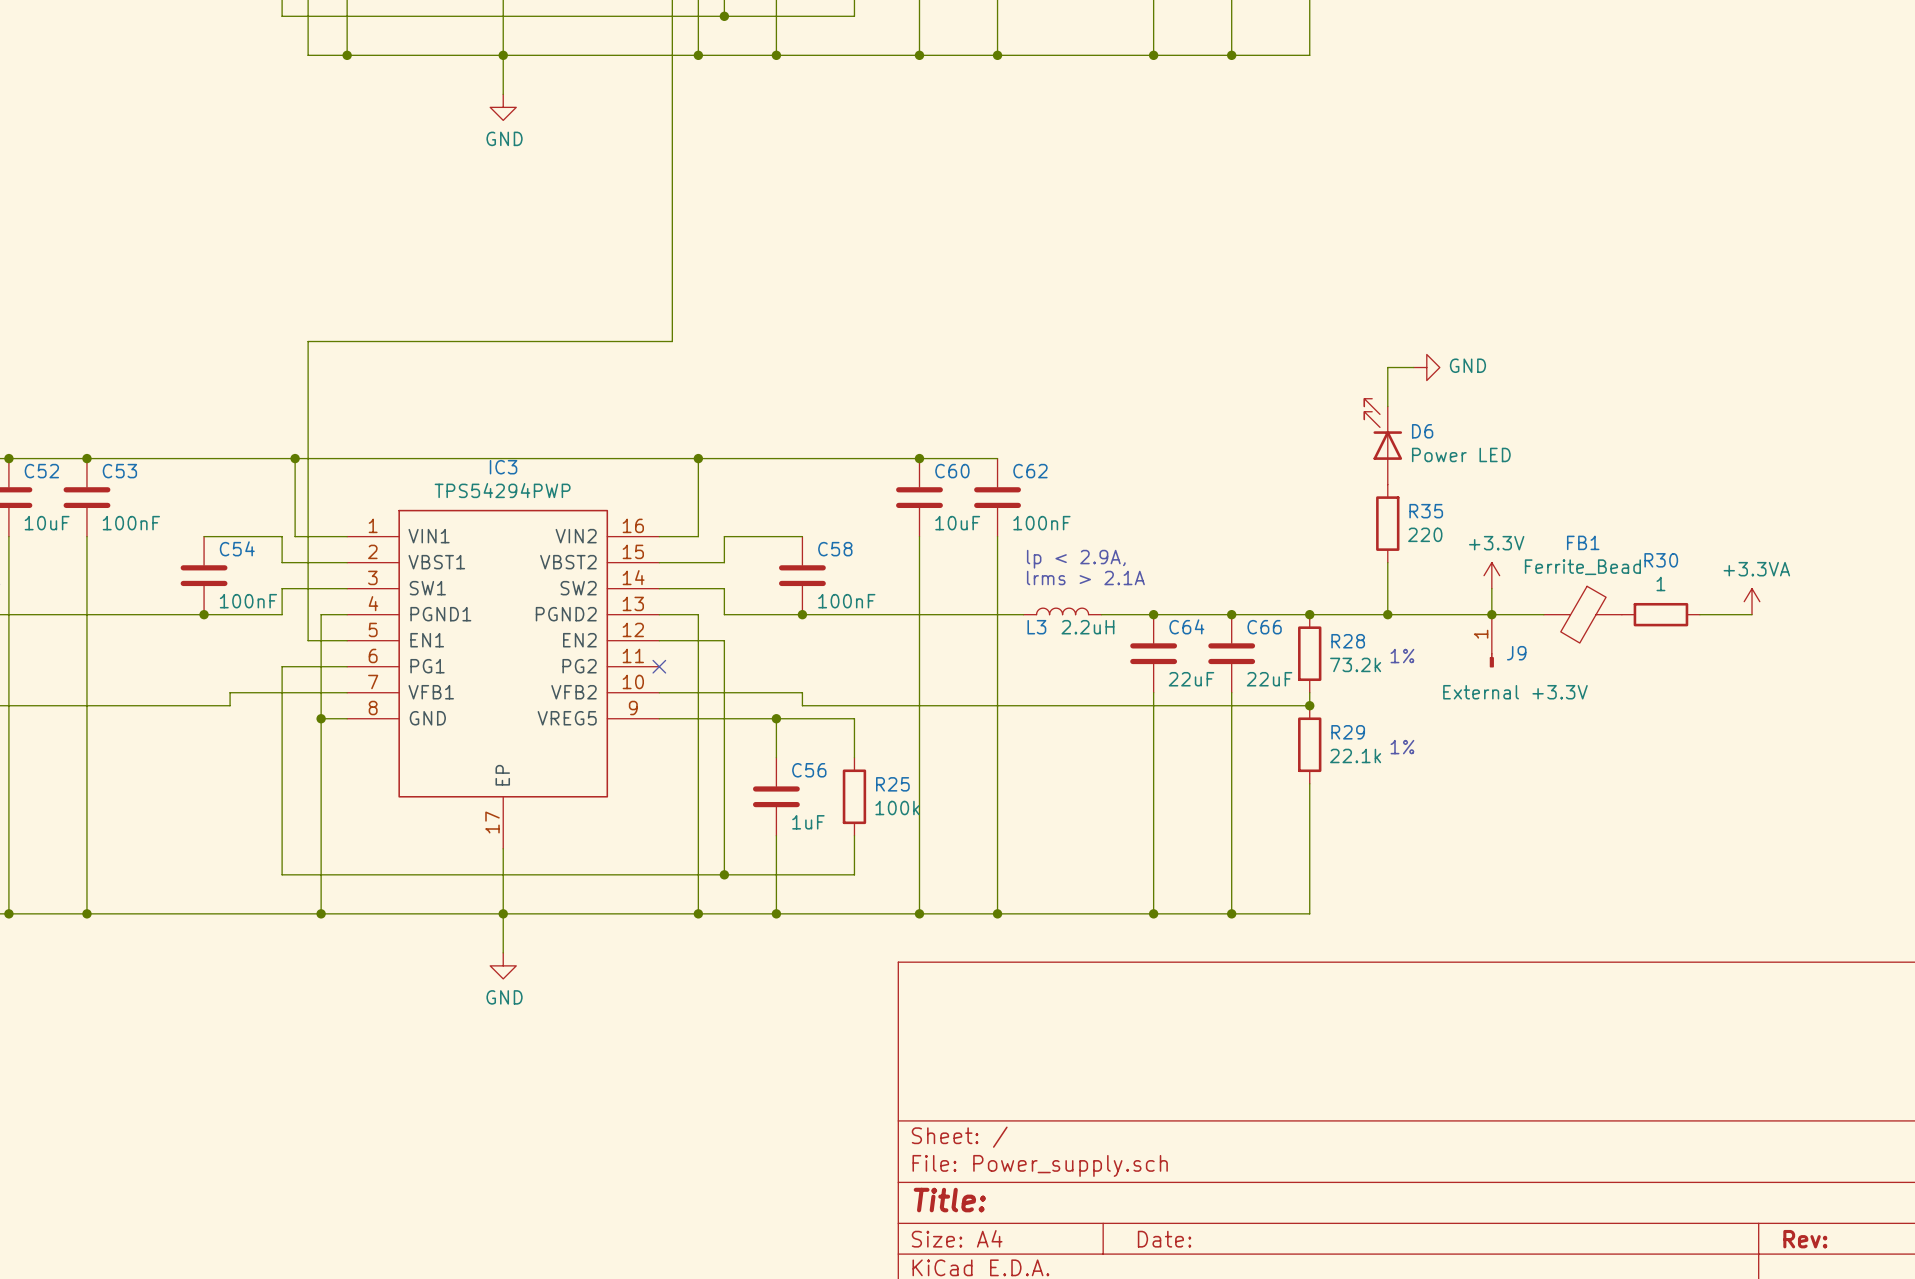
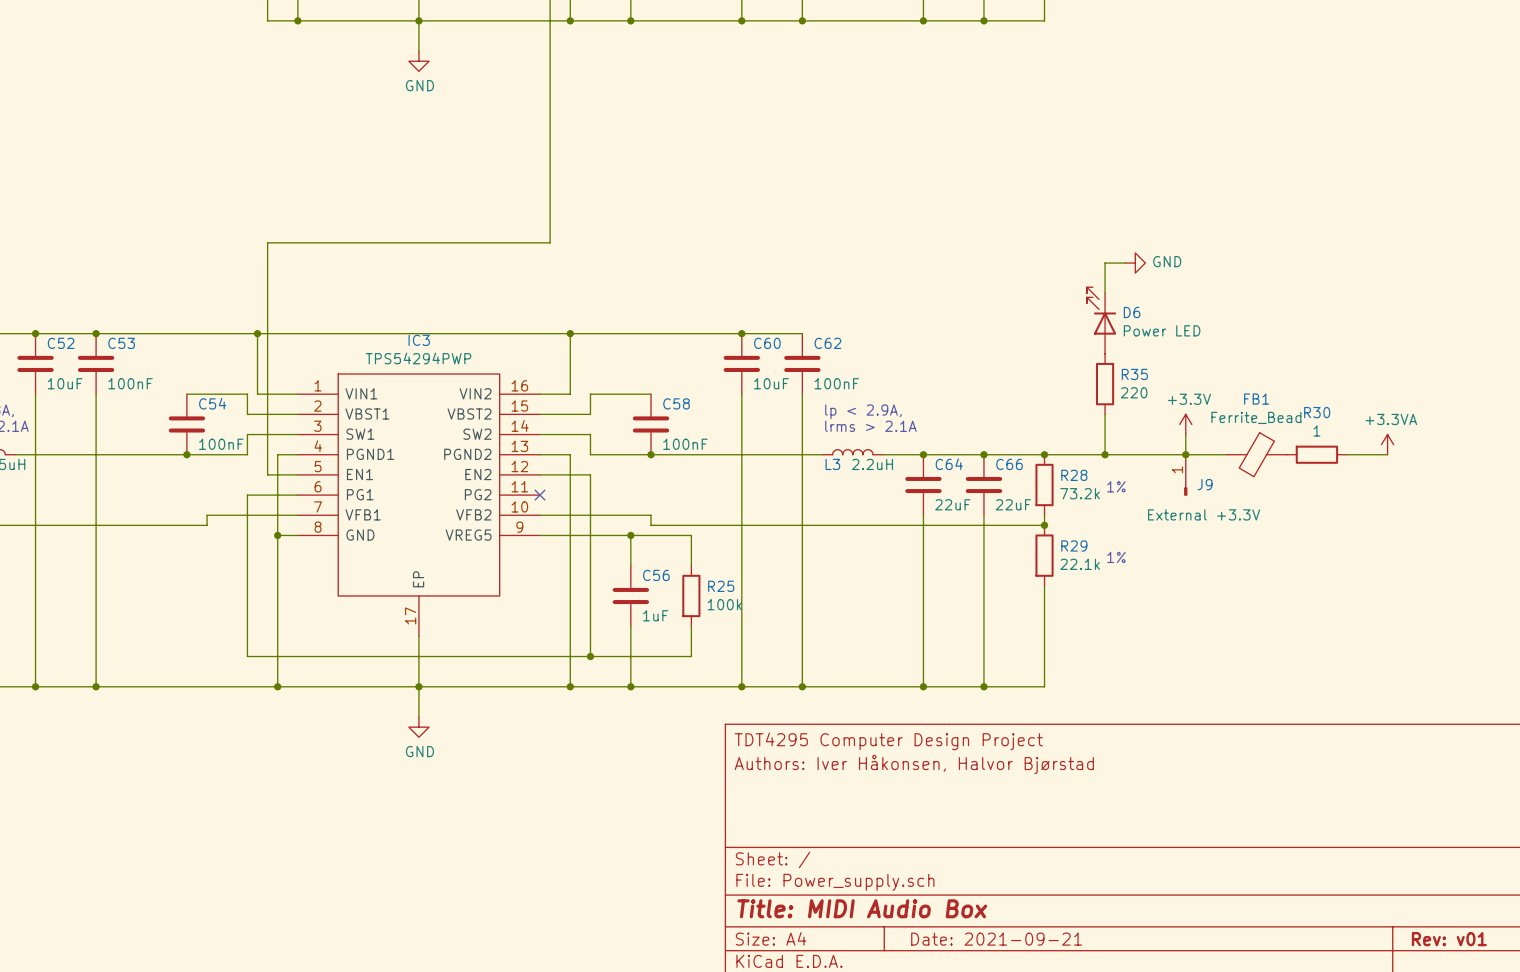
title block: none -> TDT4295 Computer Design Project (888, 741)
title block: none -> Authors: Iver Håkonsen, Halvor Bjørstad (914, 764)
title block: Title: (949, 1200) -> Title: MIDI Audio Box (862, 908)
title block: Date: (1164, 1239) -> Date: 2021-09-21 (996, 939)
title block: Rev: (1805, 1239) -> Rev: v01 (1449, 939)

